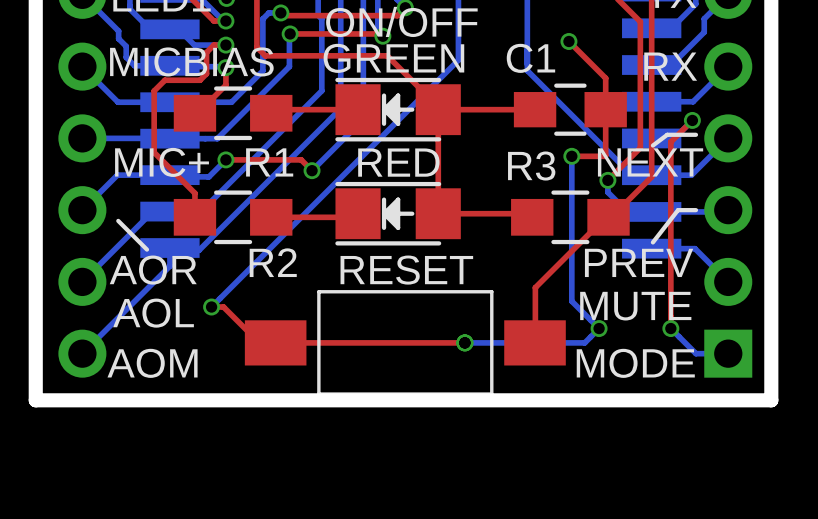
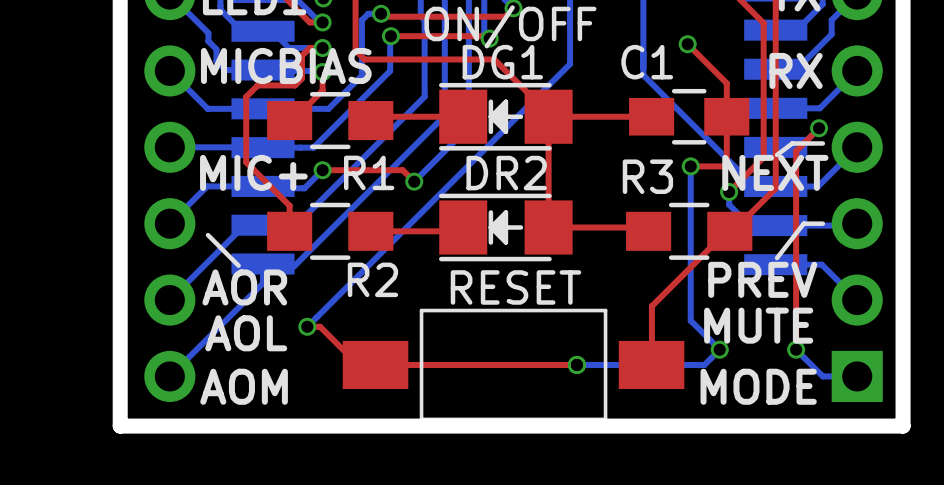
GREEN name: GREEN (393, 58) -> DG1 (502, 62)
RED name: RED (398, 162) -> DR2 (506, 173)

